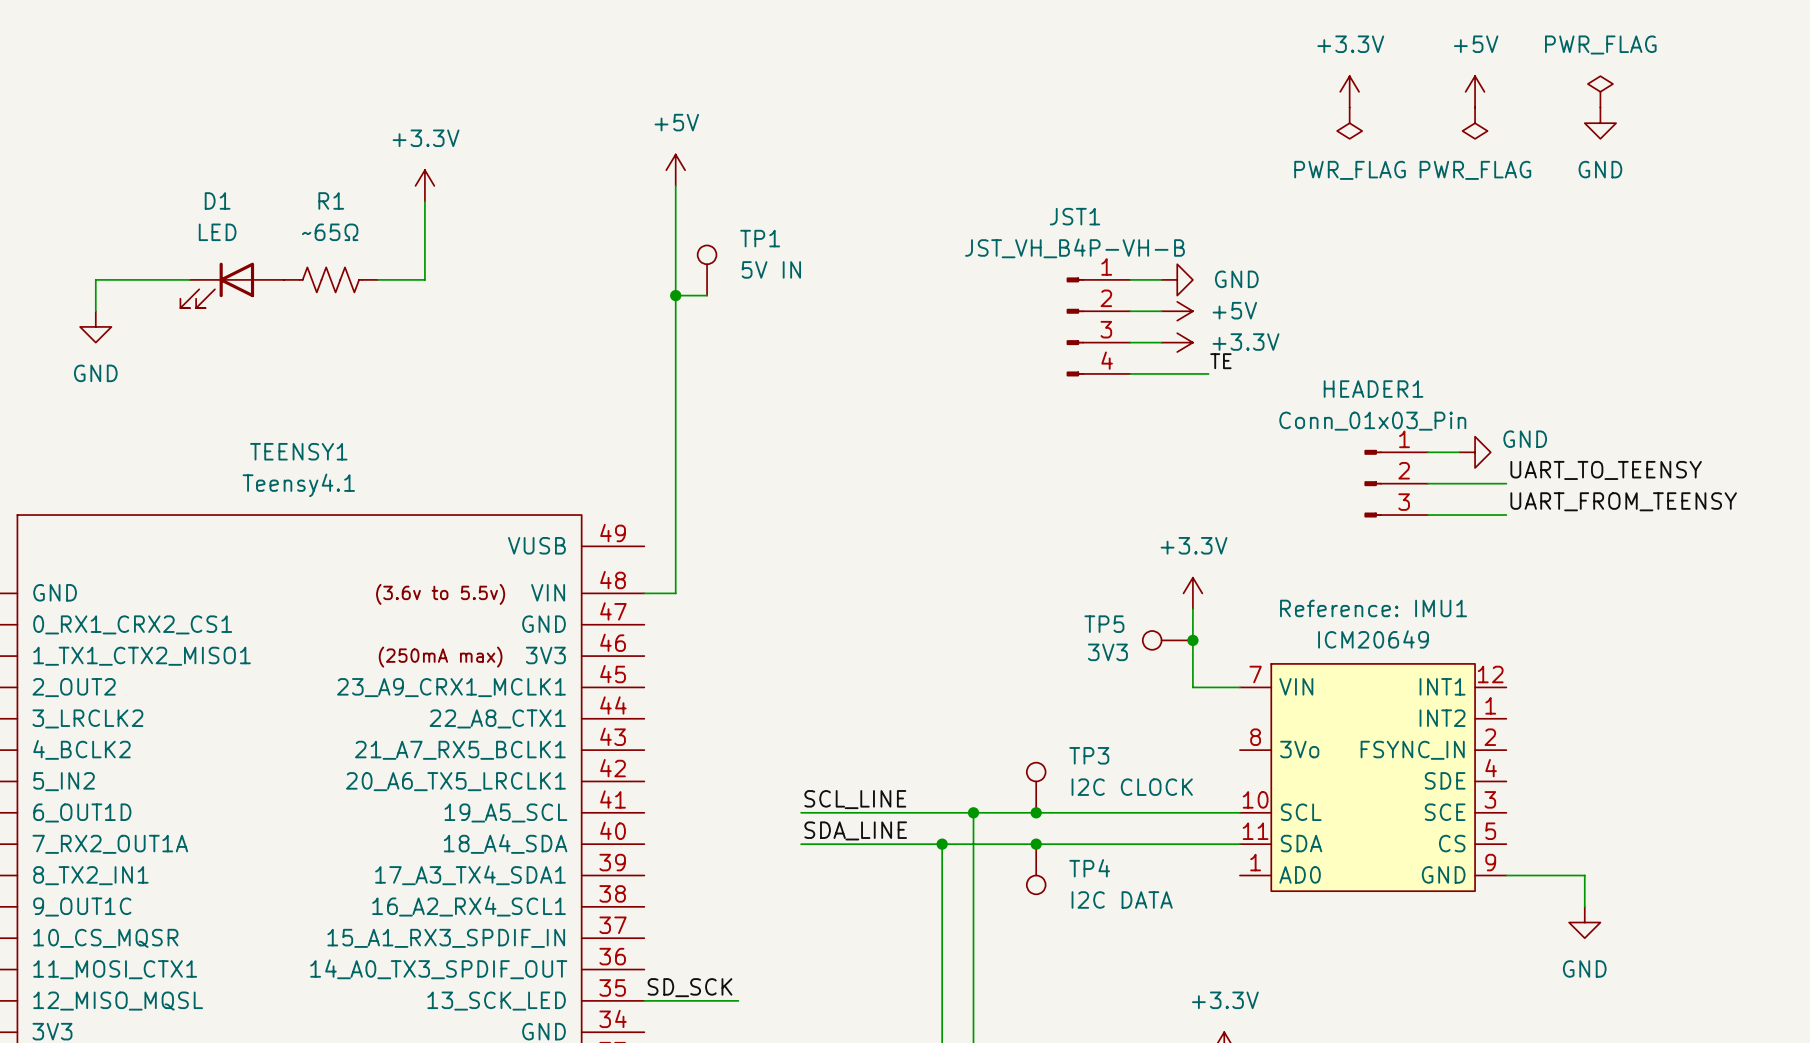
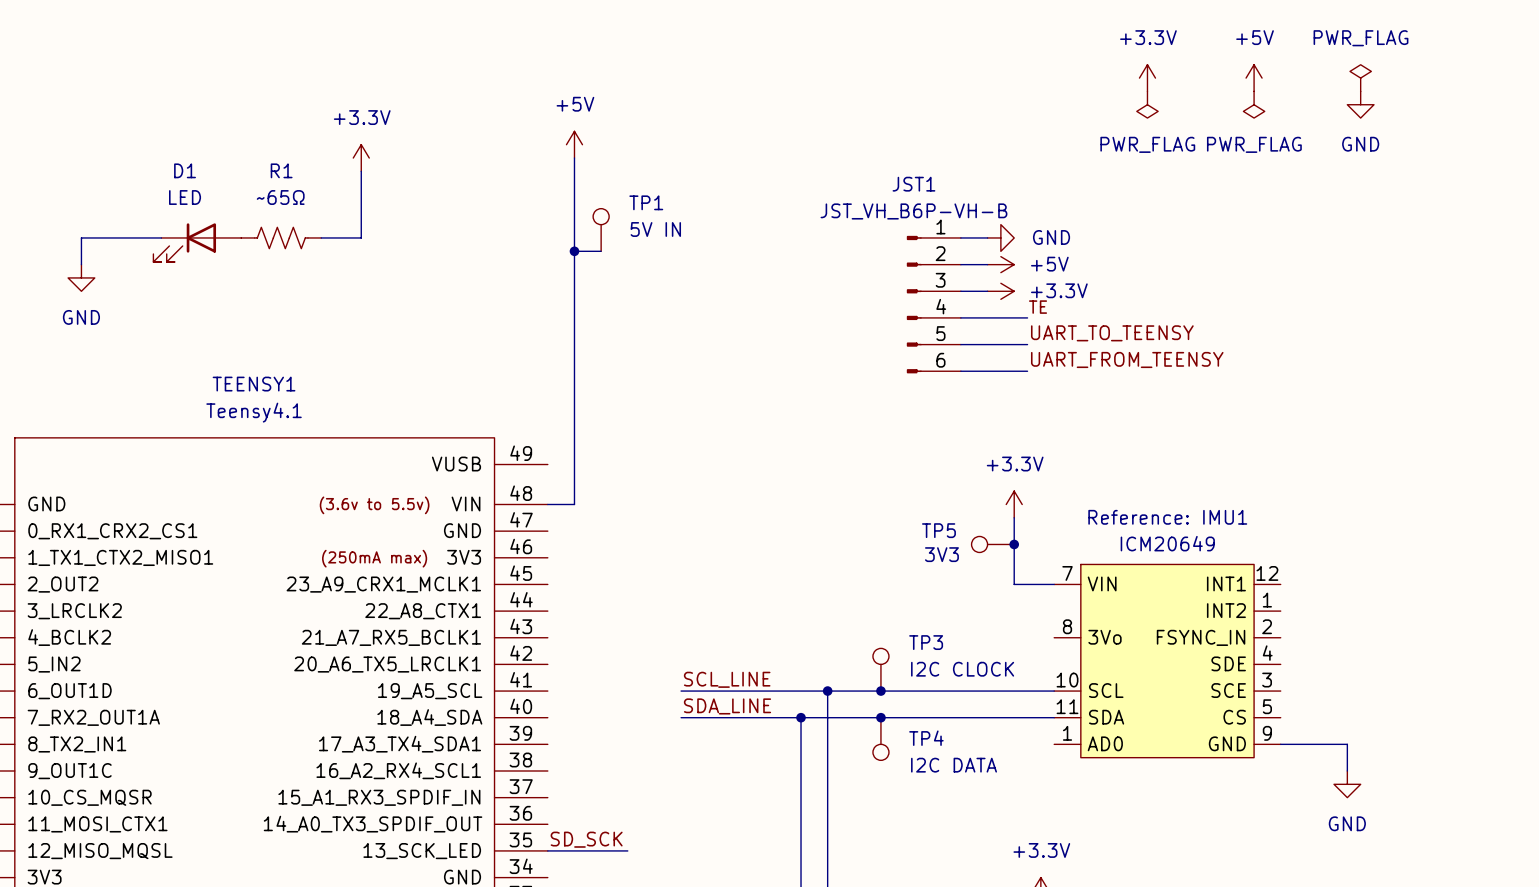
JST1 value: JST_VH_B4P-VH-B (1075, 248) -> JST_VH_B6P-VH-B (913, 211)
JST1 symbol: [1066, 277, 1131, 377] -> [906, 235, 961, 374]
wire: none -> (960, 344) (1027, 344)
wire: (1428, 452) (1459, 452) -> none
power symbol: GND (1475, 452) -> none
label position: UART_TO_TEENSY (1606, 470) -> UART_TO_TEENSY (1112, 333)
HEADER1: Conn_01x03_Pin (1396, 483) -> none
wire: (1428, 483) (1506, 483) -> (960, 371) (1027, 371)
label position: UART_FROM_TEENSY (1623, 501) -> UART_FROM_TEENSY (1127, 359)
wire: (1428, 515) (1506, 515) -> none

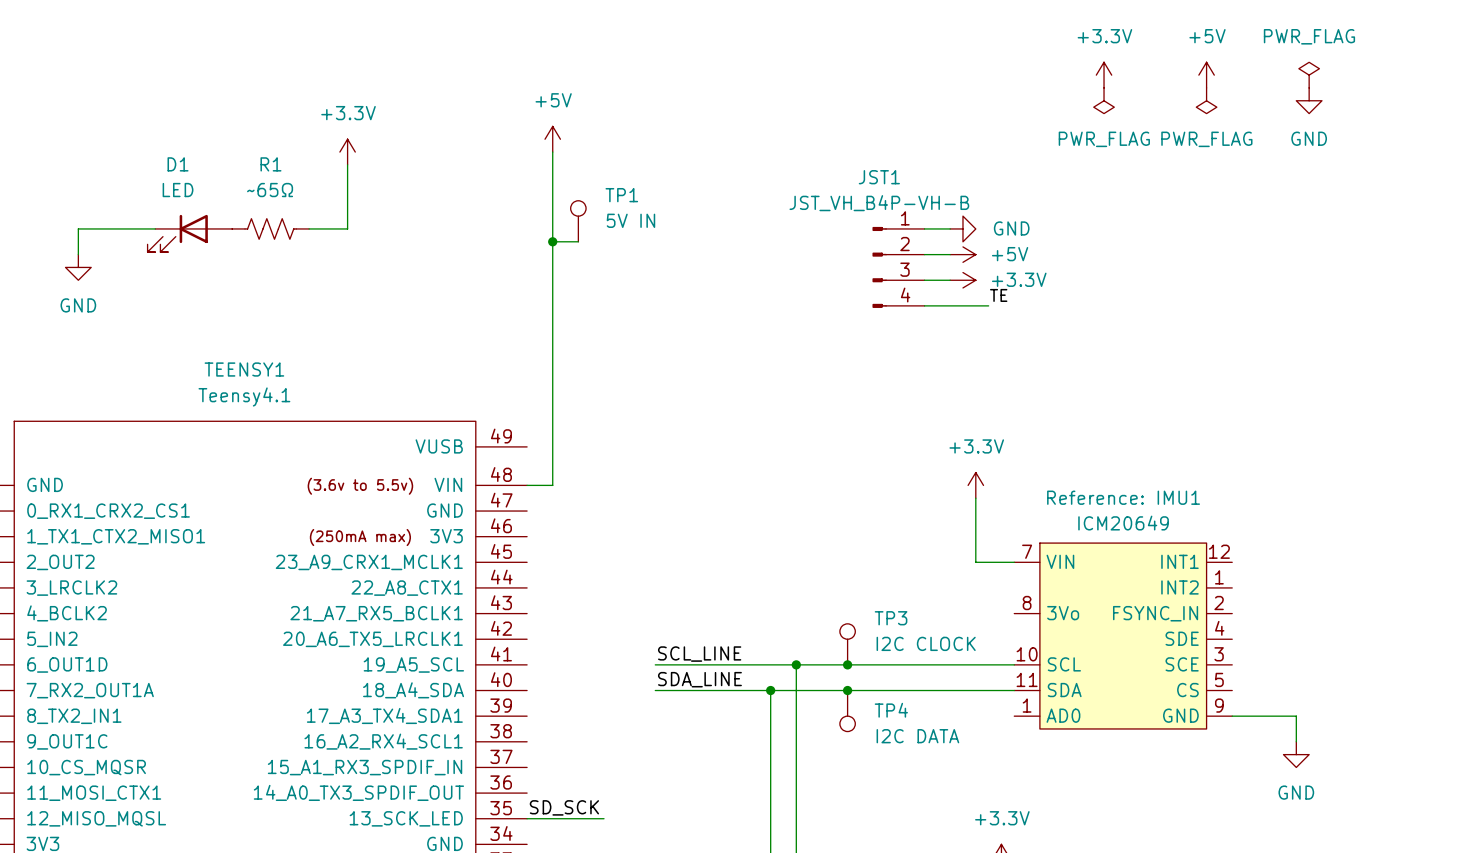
JST1 value: JST_VH_B6P-VH-B (913, 211) -> JST_VH_B4P-VH-B (879, 203)
JST1 symbol: [906, 235, 961, 374] -> [872, 226, 925, 308]
label: UART_TO_TEENSY (1112, 333) -> none
wire: (960, 344) (1027, 344) -> none
label: UART_FROM_TEENSY (1127, 359) -> none
wire: (960, 371) (1027, 371) -> none
TP5: 3V3 (992, 544) -> none
junction: (1014, 544) -> none

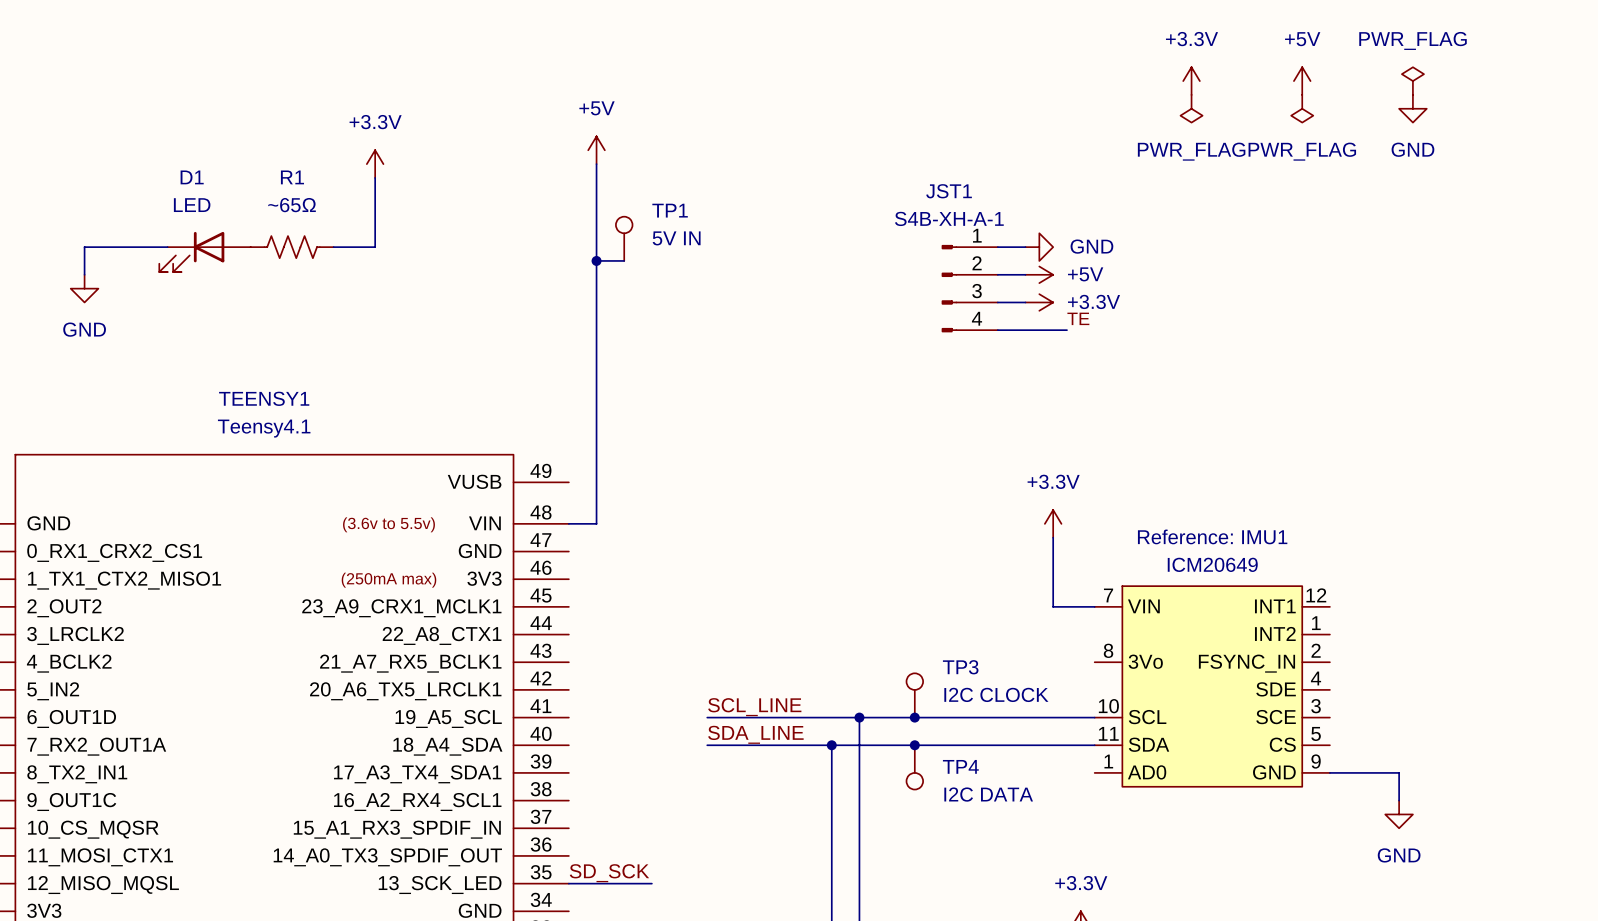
JST1 value: JST_VH_B4P-VH-B (879, 203) -> S4B-XH-A-1 (949, 218)

